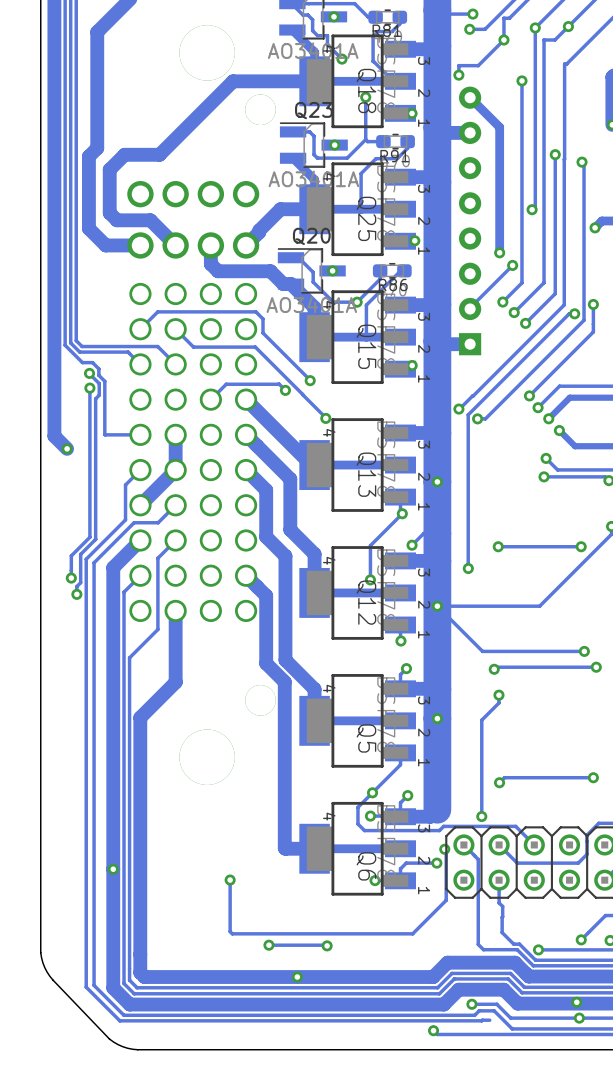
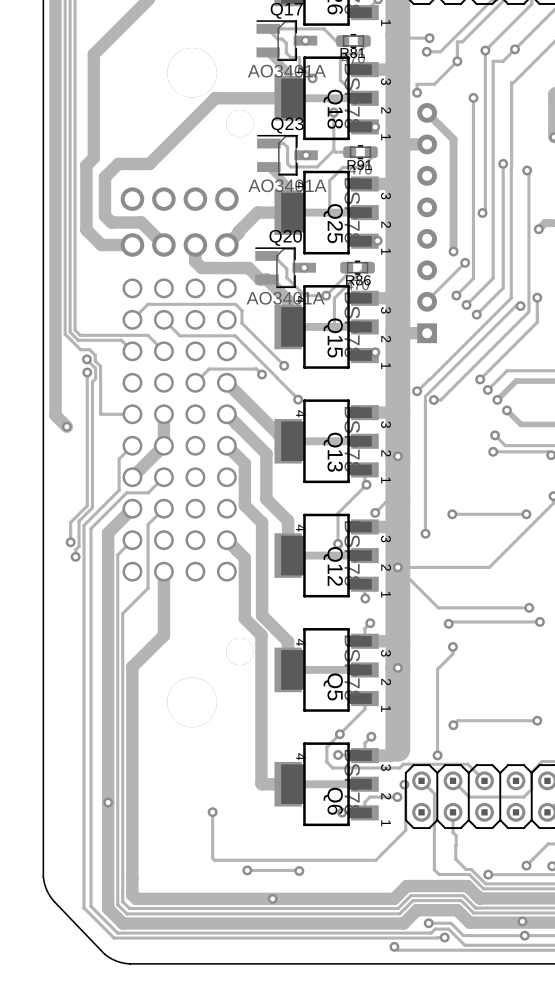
via: none -> (444, 937)

